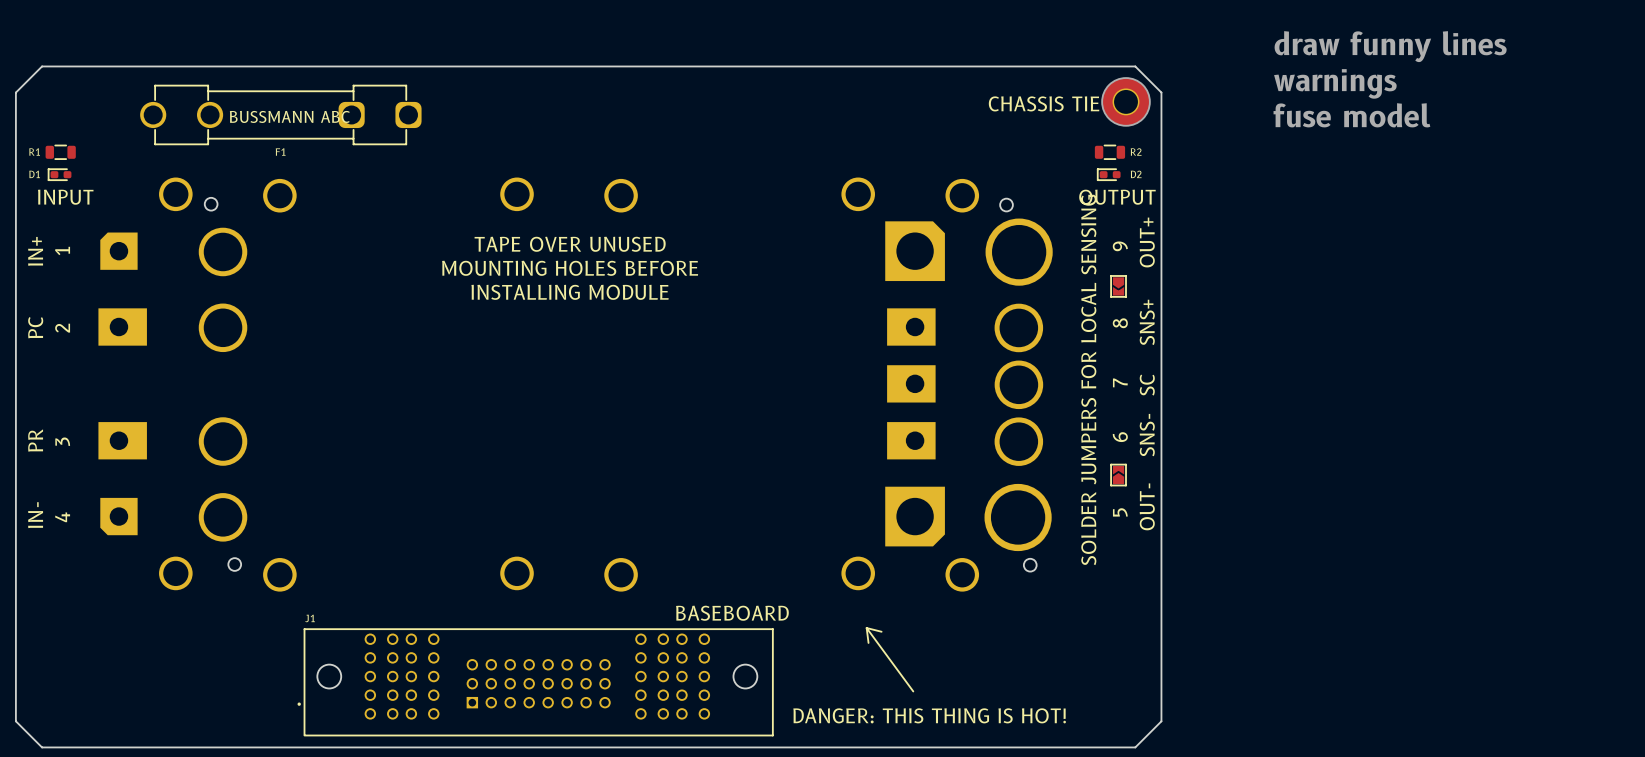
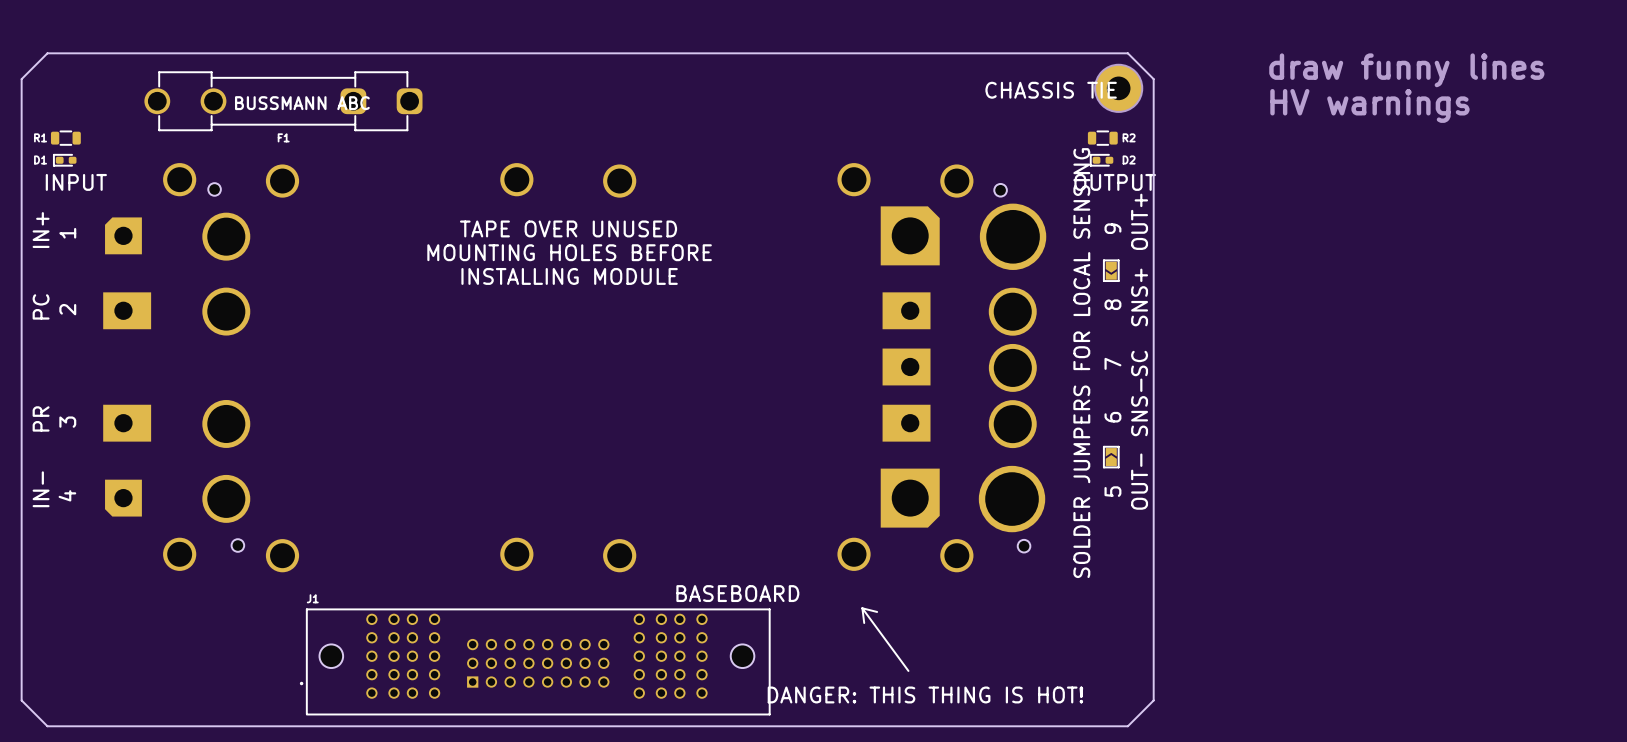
text: draw funny lines (1390, 46) -> none
text: warnings (1335, 83) -> draw funny lines (1406, 70)
text: fuse model (1351, 115) -> HV warnings (1369, 105)

